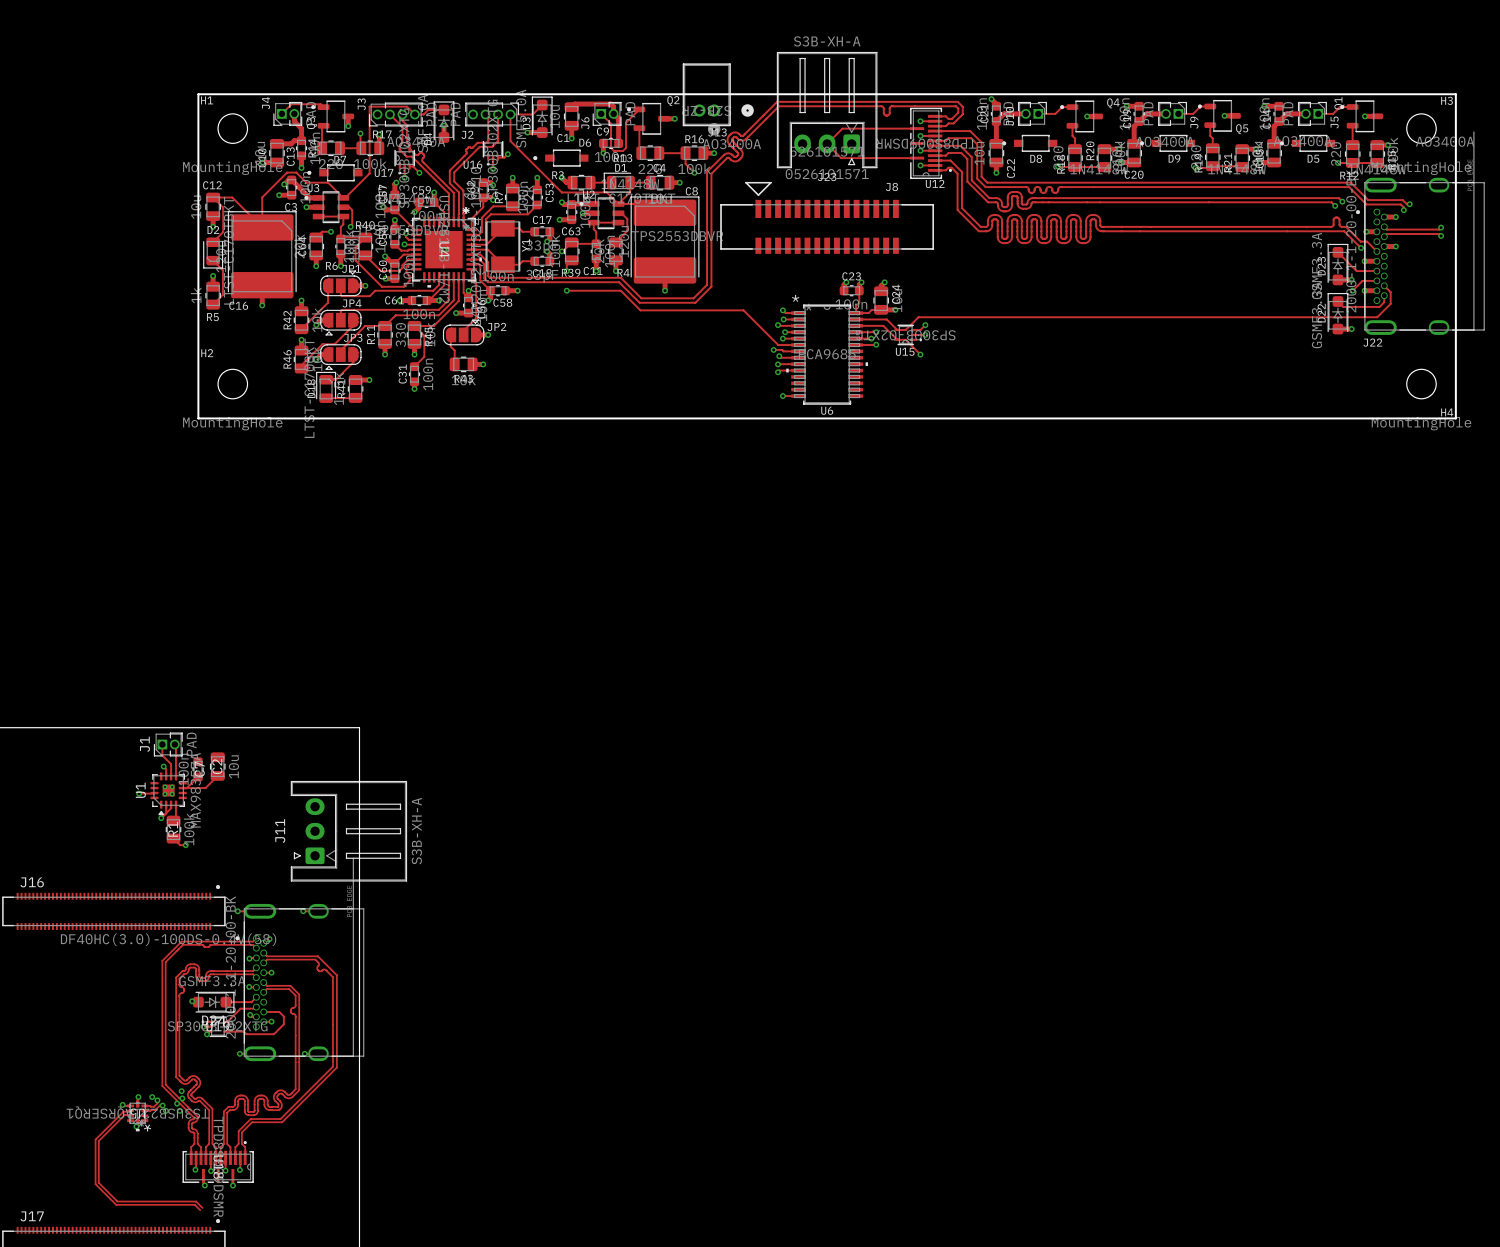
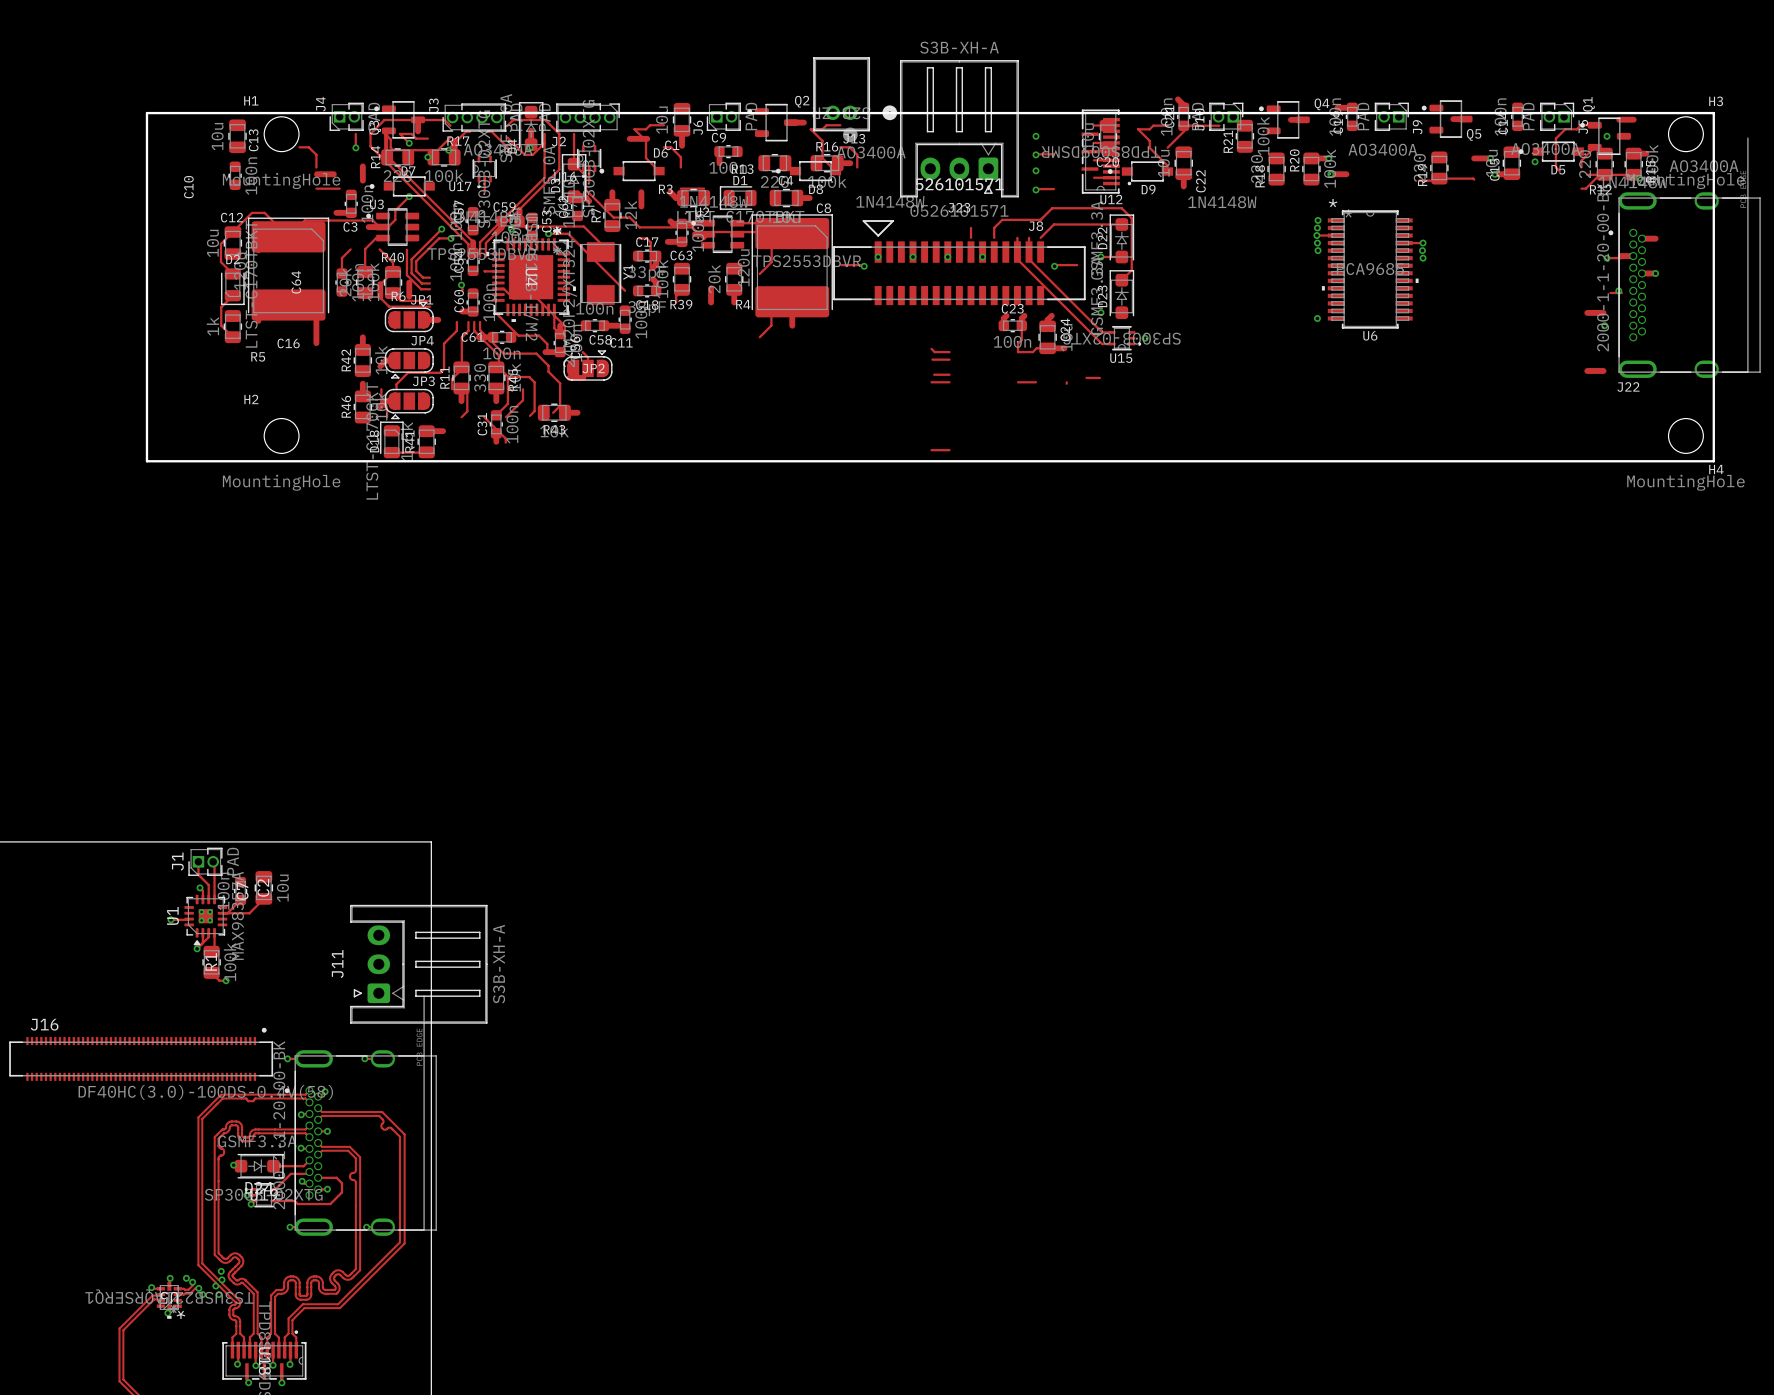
board edge: (198, 94) (1455, 94) (1455, 418) (198, 418) (198, 94) -> (146, 113) (146, 461) (1713, 461) (1713, 113) (146, 113)
via: (991, 99) -> none
track: (542, 105) (532, 114) (510, 114) (510, 141) (561, 192) (606, 192) (618, 203) (630, 192) (630, 182) (650, 182) -> none
via: (1126, 106) -> none
track: (1210, 106) (1200, 106) (1193, 113) (1178, 113) -> none
via: (1264, 106) -> none
track: (1279, 106) (1264, 106) -> none
track: (323, 107) (320, 104) (291, 104) (281, 113) -> none
track: (571, 107) (574, 104) (610, 104) (613, 106) (613, 113) (618, 118) (618, 143) -> none
track: (1072, 107) (1062, 107) (1055, 113) (1038, 113) -> none
track: (1352, 107) (1339, 107) (1333, 113) (1318, 113) -> none
track: (443, 109) (428, 109) (423, 114) (414, 114) (407, 106) (369, 106) (369, 173) (345, 197) (328, 182) (306, 182) (296, 172) (287, 172) (262, 197) (262, 227) (232, 197) (213, 197) (223, 207) (223, 232) (213, 242) -> none
track: (639, 109) (625, 122) (625, 148) (623, 150) (614, 150) (611, 147) (611, 123) (601, 113) -> none
J23 position: (827, 110) -> (959, 128)
track: (294, 113) (294, 121) (301, 128) (301, 140) (294, 140) (291, 143) (276, 143) -> none
track: (1025, 113) (1004, 113) (996, 121) (996, 143) -> none
track: (1165, 113) (1146, 113) (1134, 126) (1134, 143) -> none
track: (1305, 113) (1286, 113) (1274, 126) (1274, 143) -> none
track: (389, 114) (402, 127) (402, 142) (399, 145) (399, 149) (406, 156) (412, 156) (448, 193) (448, 221) -> none
track: (402, 114) (402, 120) (406, 125) (406, 142) (409, 145) (409, 149) (416, 155) (422, 153) (424, 156) (422, 161) (453, 192) (453, 221) -> none
track: (485, 114) (488, 117) (488, 140) (486, 142) (477, 142) (472, 147) (468, 147) (466, 150) (466, 153) (449, 170) (449, 183) (458, 192) (458, 221) -> none
track: (498, 114) (498, 140) (492, 146) (479, 146) (454, 172) (454, 181) (463, 190) (463, 221) -> none
via: (1224, 115) -> none
track: (935, 116) (945, 116) (951, 119) (958, 112) (958, 108) (955, 106) (891, 106) (889, 114) (886, 115) (881, 106) (778, 106) (745, 139) (741, 140) (734, 137) (732, 140) (741, 150) (741, 157) (735, 161) (727, 157) (711, 173) (711, 286) (695, 302) (639, 302) (619, 282) (487, 282) (484, 278) (484, 264) (479, 259) (471, 259) -> none
via: (1087, 116) -> none
Q1 position: (1361, 116) -> (1605, 136)
via position: (1365, 116) -> (1607, 136)
D3 position: (542, 117) -> (574, 178)
via: (674, 118) -> none
track: none -> (450, 125) (444, 120) (384, 120) (370, 133) (370, 146) (468, 244) (468, 256)
track: none -> (507, 125) (513, 120) (545, 120) (559, 133) (559, 169) (485, 243) (485, 256)
track: none -> (663, 125) (650, 125) (646, 129) (634, 129) (646, 140) (646, 158) (659, 171)
track: none -> (840, 125) (826, 125) (822, 129) (810, 129) (822, 140) (822, 158) (835, 171)
via: (920, 121) -> none
track: none -> (1167, 125) (1153, 125) (1149, 129) (1138, 129) (1149, 140) (1149, 147) (1167, 165) (1167, 171)
track: none -> (1219, 125) (1189, 125) (1167, 147)
track: none -> (1594, 125) (1580, 125) (1576, 129) (1565, 129) (1555, 138) (1555, 167) (1559, 171)
via position: (443, 125) -> (529, 147)
track: (1072, 125) (1074, 149) -> none
track: (1210, 125) (1212, 148) -> none
track: (1352, 125) (1352, 144) -> none
via: (348, 126) -> none
track: none -> (470, 131) (466, 131) (448, 150)
track: none -> (487, 131) (491, 131) (509, 150)
track: (935, 126) (945, 126) (948, 123) (953, 123) (962, 114) (962, 106) (957, 101) (777, 101) (743, 135) (736, 132) (731, 133) (727, 141) (738, 154) (734, 157) (730, 153) (725, 153) (707, 171) (707, 284) (693, 298) (641, 298) (620, 277) (489, 277) (488, 262) (480, 254) (471, 254) -> none
track: none -> (355, 133) (355, 147)
track: none -> (544, 133) (544, 177) (480, 242) (480, 256)
track: none -> (574, 133) (574, 164) (585, 175) (585, 189) (613, 217) (629, 217) (639, 227) (692, 227) (704, 239) (711, 232) (759, 232) (771, 243) (771, 262) (759, 273)
track: (639, 128) (639, 151) (641, 153) -> none
track: (917, 128) (842, 128) (827, 143) -> none
via: none -> (1036, 136)
track: none -> (450, 137) (437, 150) (393, 150) (390, 147) (390, 139) (385, 133) (385, 154) (474, 243) (474, 256)
track: none -> (507, 137) (524, 154) (532, 154) (544, 143)
track: (935, 131) (970, 131) (981, 142) (981, 176) (987, 182) (1350, 182) (1368, 200) (1402, 200) (1409, 204) -> none
track: none -> (427, 138) (416, 138) (411, 133) (399, 133) (409, 143)
via: (527, 132) -> none
track: (360, 133) (361, 148) (339, 148) -> none
via: (360, 133) -> none
via: (379, 134) -> none
via: (920, 135) -> none
via: none -> (409, 143)
via: (571, 138) -> none
track: none -> (299, 147) (308, 147) (316, 154) (316, 167)
track: none -> (663, 147) (670, 147) (680, 157) (680, 167)
track: none -> (840, 147) (849, 147) (857, 154) (857, 167)
track: none -> (1594, 147) (1581, 160) (1581, 167)
via: none -> (355, 147)
track: (935, 140) (945, 140) (948, 138) (971, 138) (977, 144) (977, 178) (985, 187) (1026, 187) (1031, 192) (1038, 187) (1042, 192) (1048, 187) (1054, 192) (1060, 187) (1349, 187) (1366, 204) (1400, 204) (1403, 210) -> none
via: none -> (448, 150)
track: (827, 143) (841, 158) (917, 158) -> none
D8 position: (1029, 143) -> (808, 171)
D9 position: (1167, 143) -> (1140, 171)
track: none -> (1053, 154) (1036, 154)
track: (935, 145) (960, 145) (971, 157) (971, 180) (989, 198) (999, 199) (1003, 207) (1007, 206) (1008, 195) (1012, 191) (1020, 194) (1022, 204) (1026, 204) (1028, 199) (1032, 198) (1338, 198) (1342, 201) -> none
via: (1387, 145) -> none
via: none -> (1036, 154)
C10 position: (301, 148) -> (235, 175)
via: none -> (427, 157)
via: (920, 150) -> none
via: none -> (1535, 161)
C13 position: (276, 153) -> (237, 136)
via: (603, 153) -> none
track: (659, 153) (685, 153) (685, 163) (694, 172) -> none
via: (714, 153) -> none
C20 position: (1134, 153) -> (1107, 136)
track: (507, 154) (504, 157) (498, 157) -> none
via: (507, 154) -> none
track: (935, 155) (961, 152) (967, 159) (967, 181) (988, 202) (997, 202) (998, 208) (1003, 211) (1011, 208) (1012, 196) (1017, 196) (1018, 205) (1022, 208) (1029, 207) (1032, 202) (1331, 202) (1335, 205) -> none
D6 position: (560, 158) -> (632, 171)
R21 position: (1242, 158) -> (1244, 136)
via: none -> (1036, 170)
track: none -> (1603, 171) (1585, 188) (1581, 188)
track: (935, 160) (950, 160) (961, 171) (961, 208) (980, 226) (987, 226) (990, 215) (999, 216) (1002, 220) (1003, 238) (1007, 237) (1007, 219) (1012, 215) (1018, 215) (1021, 218) (1021, 237) (1023, 238) (1027, 237) (1027, 219) (1032, 215) (1037, 215) (1040, 218) (1041, 237) (1043, 238) (1046, 237) (1047, 219) (1052, 215) (1057, 215) (1060, 218) (1061, 237) (1062, 238) (1066, 237) (1066, 219) (1071, 215) (1077, 215) (1080, 218) (1080, 237) (1082, 238) (1086, 237) (1086, 219) (1091, 215) (1099, 217) (1102, 226) (1331, 226) (1333, 225) (1333, 218) (1337, 217) (1339, 219) (1340, 226) (1346, 226) (1360, 241) (1367, 241) (1376, 251) -> none
via: (262, 162) -> none
via: (1337, 163) -> none
via: (920, 165) -> none
via: none -> (1639, 178)
track: (409, 166) (413, 166) (419, 172) -> none
track: (1057, 166) (1104, 167) -> none
via: (1057, 166) -> none
via: (301, 167) -> none
via: (1195, 167) -> none
via: (493, 168) -> none
track: (935, 170) (945, 170) (951, 167) (957, 173) (957, 209) (978, 231) (989, 230) (992, 220) (997, 219) (997, 238) (1002, 243) (1007, 242) (1011, 239) (1011, 220) (1013, 219) (1017, 220) (1017, 238) (1021, 242) (1027, 242) (1030, 239) (1031, 220) (1033, 219) (1036, 220) (1037, 237) (1039, 242) (1046, 243) (1050, 240) (1051, 220) (1054, 219) (1056, 220) (1057, 239) (1061, 243) (1067, 242) (1070, 237) (1070, 220) (1074, 219) (1076, 220) (1076, 239) (1080, 242) (1085, 243) (1090, 238) (1090, 220) (1094, 219) (1096, 228) (1102, 231) (1344, 231) (1359, 246) -> none
via: (419, 172) -> none
via: (694, 172) -> none
via: (996, 172) -> none
track: none -> (316, 188) (339, 188)
track: none -> (680, 188) (704, 188)
via: none -> (1036, 189)
track: none -> (1053, 189) (1036, 189)
via: (404, 177) -> none
via: (512, 177) -> none
via: (537, 177) -> none
via: (561, 177) -> none
track: none -> (409, 196) (395, 210) (395, 219) (387, 227) (379, 227) (372, 220) (304, 220) (288, 236) (264, 212) (252, 212) (220, 243) (220, 262) (232, 273)
via: none -> (409, 196)
track: (396, 182) (394, 194) -> none
via: (396, 182) -> none
track: (590, 182) (611, 182) -> none
via: (679, 182) -> none
track: (284, 184) (288, 179) (291, 179) (309, 197) (318, 197) -> none
via: (284, 184) -> none
via: (493, 185) -> none
via: (434, 192) -> none
via: (279, 195) -> none
C53 position: (537, 197) -> (532, 226)
track: (493, 200) (490, 197) (483, 197) (483, 207) (471, 218) (471, 230) -> none
via: (493, 200) -> none
via: none -> (1318, 220)
via: (1342, 201) -> none
via: (561, 202) -> none
via: (1409, 204) -> none
track: (537, 205) (527, 214) (490, 214) (485, 219) (485, 239) (471, 239) -> none
track: none -> (1121, 224) (1053, 224) (1040, 237)
via: (1335, 205) -> none
C12 position: (213, 206) -> (232, 243)
track: (512, 206) (493, 206) (481, 217) (481, 231) (478, 234) (471, 234) -> none
via: (306, 207) -> none
track: (343, 207) (349, 207) (352, 210) (350, 226) -> none
track: (383, 207) (386, 209) (394, 209) (416, 230) -> none
via: (383, 207) -> none
track: none -> (971, 227) (971, 237)
track: none -> (441, 229) (411, 259) (411, 273) (421, 283) (429, 283)
via: none -> (441, 229)
track: none -> (511, 229) (514, 226) (583, 226) (606, 249) (610, 249)
via: none -> (511, 229)
via: none -> (1317, 227)
via: (1403, 210) -> none
via: (414, 212) -> none
track: none -> (548, 233) (568, 233) (625, 290)
via: none -> (548, 233)
via: (582, 213) -> none
track: (618, 213) (621, 213) (627, 218) (627, 231) (615, 242) -> none
track: none -> (1316, 235) (1335, 235)
via: none -> (1316, 235)
track: none -> (379, 238) (375, 238) (365, 249) (365, 271)
track: (318, 216) (343, 216) (340, 238) (365, 237) (355, 247) (355, 260) (381, 286) (403, 286) (409, 280) (406, 266) (408, 264) (416, 264) -> none
track: none -> (451, 238) (439, 238) (416, 261) (416, 270) (423, 277) (429, 277)
via: none -> (451, 238)
track: none -> (639, 238) (646, 238) (650, 242) (650, 269)
track: none -> (994, 237) (994, 227) (1002, 219) (1040, 219) (1052, 208) (1121, 208) (1131, 218) (1131, 270) (1121, 280)
track: none -> (1017, 237) (1017, 259) (1102, 344) (1112, 344)
track: none -> (1029, 237) (1029, 259) (1102, 332) (1112, 332)
J8 position: (827, 217) -> (959, 262)
via: (1395, 217) -> none
via: (559, 219) -> none
via: (394, 220) -> none
via: none -> (1317, 243)
track: none -> (1404, 243) (1423, 243)
via: none -> (1423, 243)
track: (618, 222) (593, 222) (596, 243) (571, 242) (561, 251) -> none
via: (213, 226) -> none
track: none -> (350, 249) (341, 258) (341, 273)
track: none -> (379, 249) (393, 262) (393, 271) (381, 283) (381, 298) (389, 306) (429, 306)
track: none -> (406, 249) (406, 275) (421, 289) (429, 289)
via: (350, 226) -> none
track: (1384, 226) (1386, 229) (1439, 229) (1441, 227) -> none
via: none -> (1318, 250)
via: none -> (1422, 250)
via: (1441, 227) -> none
track: (331, 231) (322, 231) (316, 237) -> none
via: (331, 231) -> none
track: (534, 231) (522, 231) (519, 228) (502, 228) (486, 244) (471, 244) -> none
via: (1366, 231) -> none
via: none -> (878, 256)
via: none -> (912, 256)
via: none -> (947, 256)
via: none -> (982, 256)
track: none -> (1100, 256) (1121, 256)
via: none -> (1100, 256)
track: (406, 233) (408, 239) (416, 239) -> none
via: (406, 233) -> none
via: none -> (1423, 258)
track: none -> (1607, 258) (1621, 258)
via: none -> (1607, 258)
track: (1441, 235) (1439, 233) (1386, 233) (1384, 236) -> none
via: (1441, 235) -> none
track: none -> (841, 265) (864, 266)
track: none -> (1077, 265) (1054, 266)
via: none -> (864, 266)
via: none -> (1054, 266)
via: (547, 241) -> none
track: (394, 244) (401, 250) (416, 249) -> none
via: (404, 244) -> none
R6 position: (316, 246) -> (365, 282)
C64 position: (340, 246) -> (341, 282)
R40 position: (365, 246) -> (393, 282)
via: (1361, 247) -> none
via: (443, 249) -> none
track: (471, 249) (487, 249) (502, 264) (519, 264) (522, 261) (534, 261) -> none
via: (547, 251) -> none
via: (561, 251) -> none
C11 position: (596, 251) -> (625, 319)
track: (1337, 252) (1356, 271) (1376, 271) -> none
D2 position: (213, 253) -> (232, 286)
C16 position: (262, 254) -> (288, 269)
track: (416, 254) (403, 254) (394, 263) (392, 263) (385, 256) -> none
track: (365, 255) (380, 270) (399, 270) (408, 259) (416, 259) -> none
track: none -> (495, 289) (504, 289) (513, 298) (537, 298) (564, 326) (564, 338)
track: (213, 260) (222, 270) (222, 294) (213, 304) -> none
track: (1364, 261) (1376, 261) -> none
track: none -> (393, 293) (400, 300) (429, 300)
track: none -> (1610, 292) (1621, 292)
track: (471, 264) (480, 265) (480, 280) (490, 290) (490, 298) (488, 300) -> none
D23 position: (1337, 264) -> (1121, 294)
track: none -> (232, 295) (221, 307) (221, 325) (232, 337)
track: none -> (759, 295) (771, 307) (771, 325) (759, 337)
via: (316, 266) -> none
via: (340, 266) -> none
track: (471, 269) (471, 279) (476, 284) (476, 318) (463, 330) (463, 334) -> none
via: (566, 271) -> none
via: (596, 271) -> none
via: (615, 271) -> none
via: (213, 275) -> none
track: (439, 277) (439, 284) (433, 290) (375, 290) (369, 296) (341, 296) (340, 285) -> none
track: (443, 277) (443, 285) (427, 300) (439, 300) -> none
track: (448, 277) (448, 299) (438, 309) (341, 309) (340, 320) -> none
track: (453, 277) (453, 300) (438, 315) (395, 315) (385, 325) (365, 325) (340, 350) (340, 354) -> none
track: (458, 277) (458, 301) (433, 325) (414, 325) (424, 335) -> (474, 321) (474, 330) (498, 355) (498, 367) (507, 378)
via: (385, 278) -> none
track: none -> (495, 312) (518, 335) (538, 335) (547, 344) (547, 352)
via: none -> (1100, 312)
via: (1351, 279) -> none
track: (1376, 280) (1362, 280) (1352, 290) -> none
via: (846, 282) -> none
via: (861, 282) -> none
via: (884, 282) -> none
via: none -> (1317, 318)
track: (328, 285) (328, 302) (301, 329) -> none
via: (365, 285) -> none
track: (1384, 285) (1390, 292) (1390, 303) (1377, 317) (918, 317) (905, 330) (897, 330) (886, 319) (856, 319) -> none
track: none -> (456, 321) (456, 330) (444, 343) (444, 368) (440, 372) (408, 372) (396, 384) (396, 389)
track: none -> (468, 321) (468, 330) (461, 337) (461, 369) (452, 378) (452, 389)
track: none -> (480, 321) (480, 330) (503, 353) (536, 353) (548, 365) (548, 371) (560, 383) (560, 405) (553, 412)
via: (468, 290) -> none
via: (517, 290) -> none
track: (566, 290) (620, 290) (640, 310) (743, 310) (778, 345) (798, 345) -> none
via: (566, 290) -> none
via: (665, 290) -> none
track: (1364, 290) (1376, 290) -> none
via: (1364, 290) -> none
R5 position: (213, 295) -> (232, 326)
track: (1384, 295) (1384, 302) (1379, 306) (1343, 306) (1337, 301) -> none
via: (301, 300) -> none
via: (399, 300) -> none
via: (439, 300) -> none
via: (488, 300) -> none
via: none -> (1145, 338)
via: (262, 305) -> none
via: (895, 309) -> none
via: (782, 310) -> none
via: (456, 313) -> none
track: none -> (582, 352) (588, 357) (588, 368)
D22 position: (1337, 313) -> (1121, 238)
via: (783, 319) -> none
track: (353, 320) (353, 325) (334, 344) (322, 344) (301, 365) (301, 368) -> none
via: (316, 325) -> none
track: (778, 325) (798, 325) -> none
via: (778, 325) -> none
track: (856, 325) (883, 325) (897, 339) (905, 339) (920, 354) -> none
track: (925, 325) (920, 330) (914, 330) -> none
via: (925, 325) -> none
via: (1351, 329) -> none
JP2 position: (463, 332) -> (588, 365)
via: (785, 332) -> none
track: (856, 332) (876, 332) -> none
via: (876, 332) -> none
track: (450, 334) (450, 346) (454, 350) (454, 364) -> none
via: (488, 334) -> none
U15 position: (908, 334) -> (1124, 338)
via: (925, 334) -> none
track: none -> (507, 378) (529, 377) (534, 382) (534, 411) (529, 415)
via: (782, 338) -> none
via: (871, 338) -> none
via: (301, 339) -> none
track: none -> (381, 389) (381, 403) (387, 408) (387, 417)
track: none -> (467, 389) (467, 411) (461, 417)
track: none -> (523, 389) (523, 400) (506, 417)
track: (876, 344) (856, 345) -> none
via: (876, 344) -> none
track: (773, 349) (798, 351) -> none
via: (773, 349) -> none
track: (353, 354) (353, 362) (335, 379) (326, 379) -> none
via: (385, 354) -> none
via: (414, 354) -> none
U6 position: (827, 354) -> (1370, 269)
via: (920, 354) -> none
track: (779, 356) (798, 357) -> none
via: (779, 356) -> none
via: (316, 359) -> none
via: (483, 364) -> none
via: (778, 364) -> none
track: (798, 364) (778, 364) -> none
track: none -> (484, 417) (505, 438) (505, 442)
track: (798, 370) (779, 370) (778, 372) -> none
via: (778, 372) -> none
via: (369, 380) -> none
via: (414, 388) -> none
via: (782, 396) -> none

